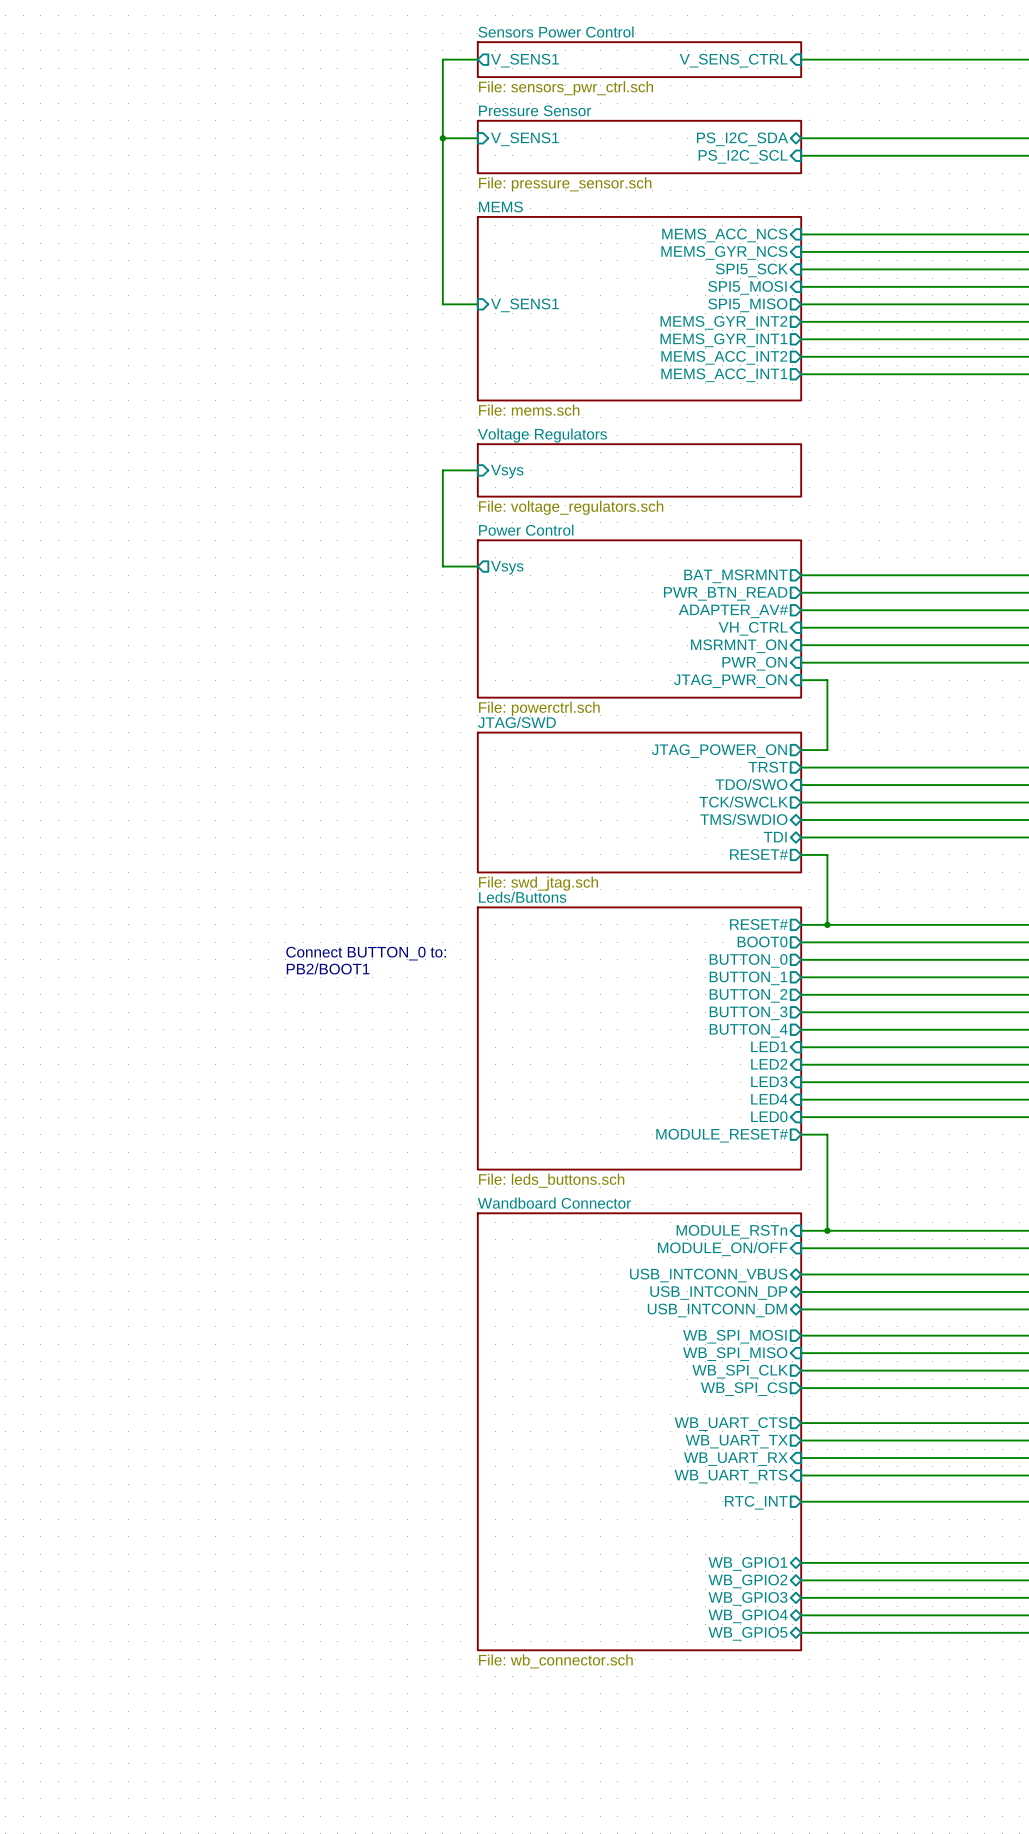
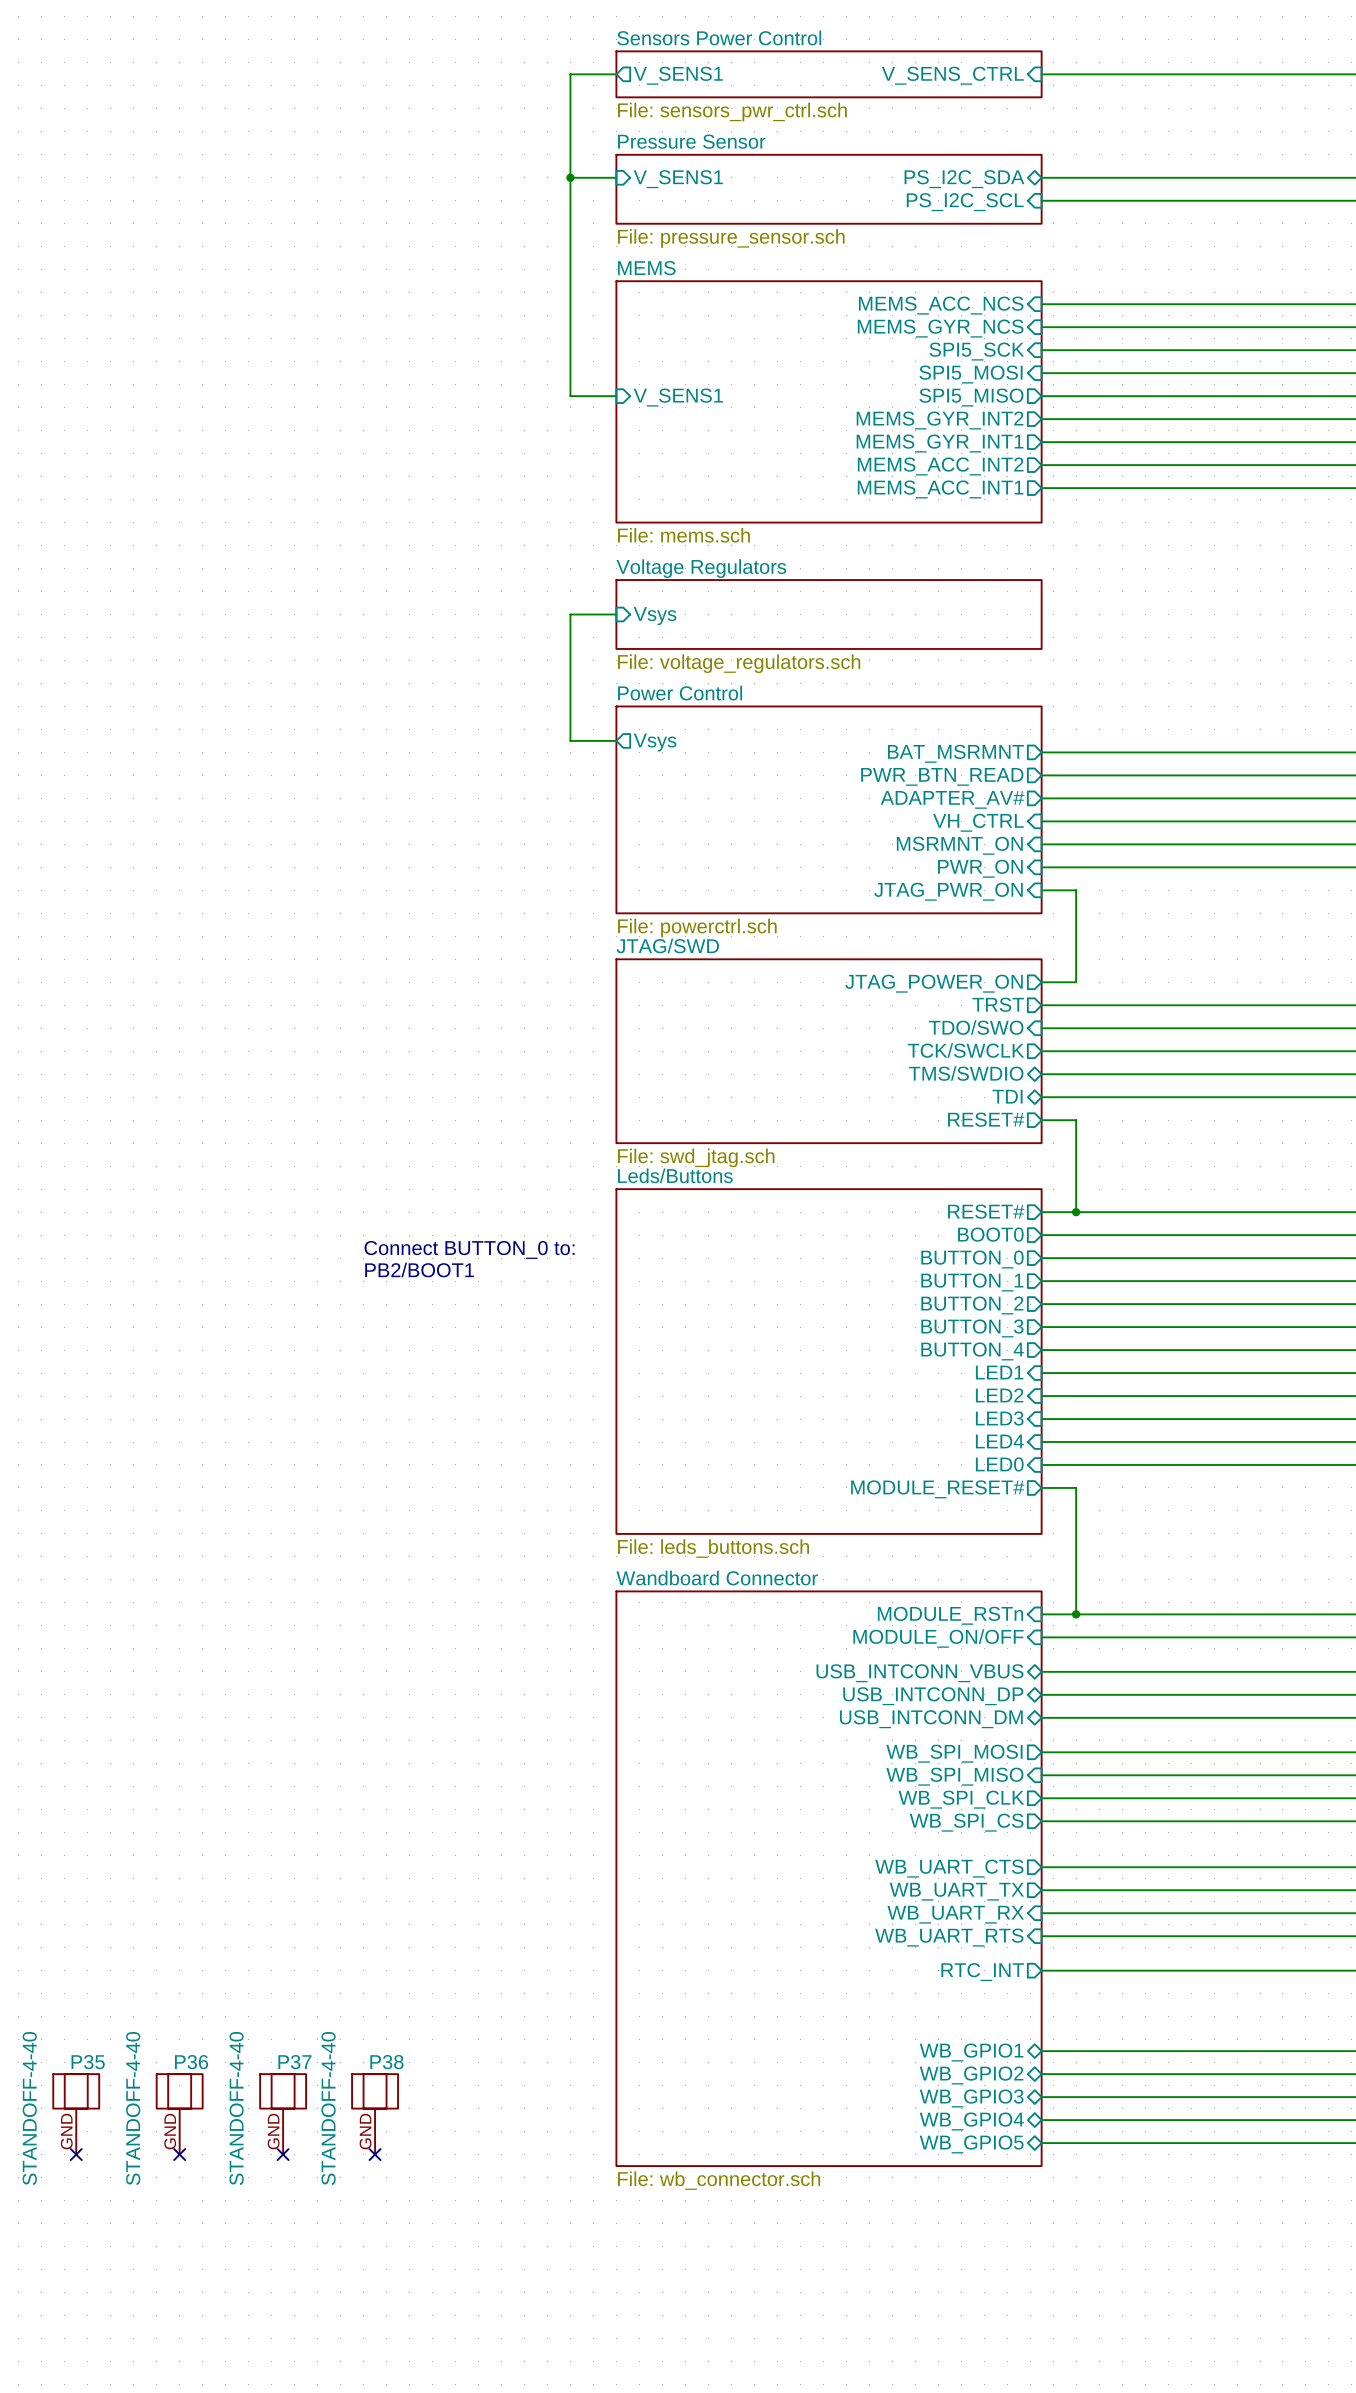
P35: none -> STANDOFF-4-40 (76, 2114)
P36: none -> STANDOFF-4-40 (179, 2114)
P37: none -> STANDOFF-4-40 (283, 2114)
P38: none -> STANDOFF-4-40 (375, 2114)
no-connect mark: none -> (76, 2154)
no-connect mark: none -> (179, 2154)
no-connect mark: none -> (283, 2154)
no-connect mark: none -> (375, 2154)

